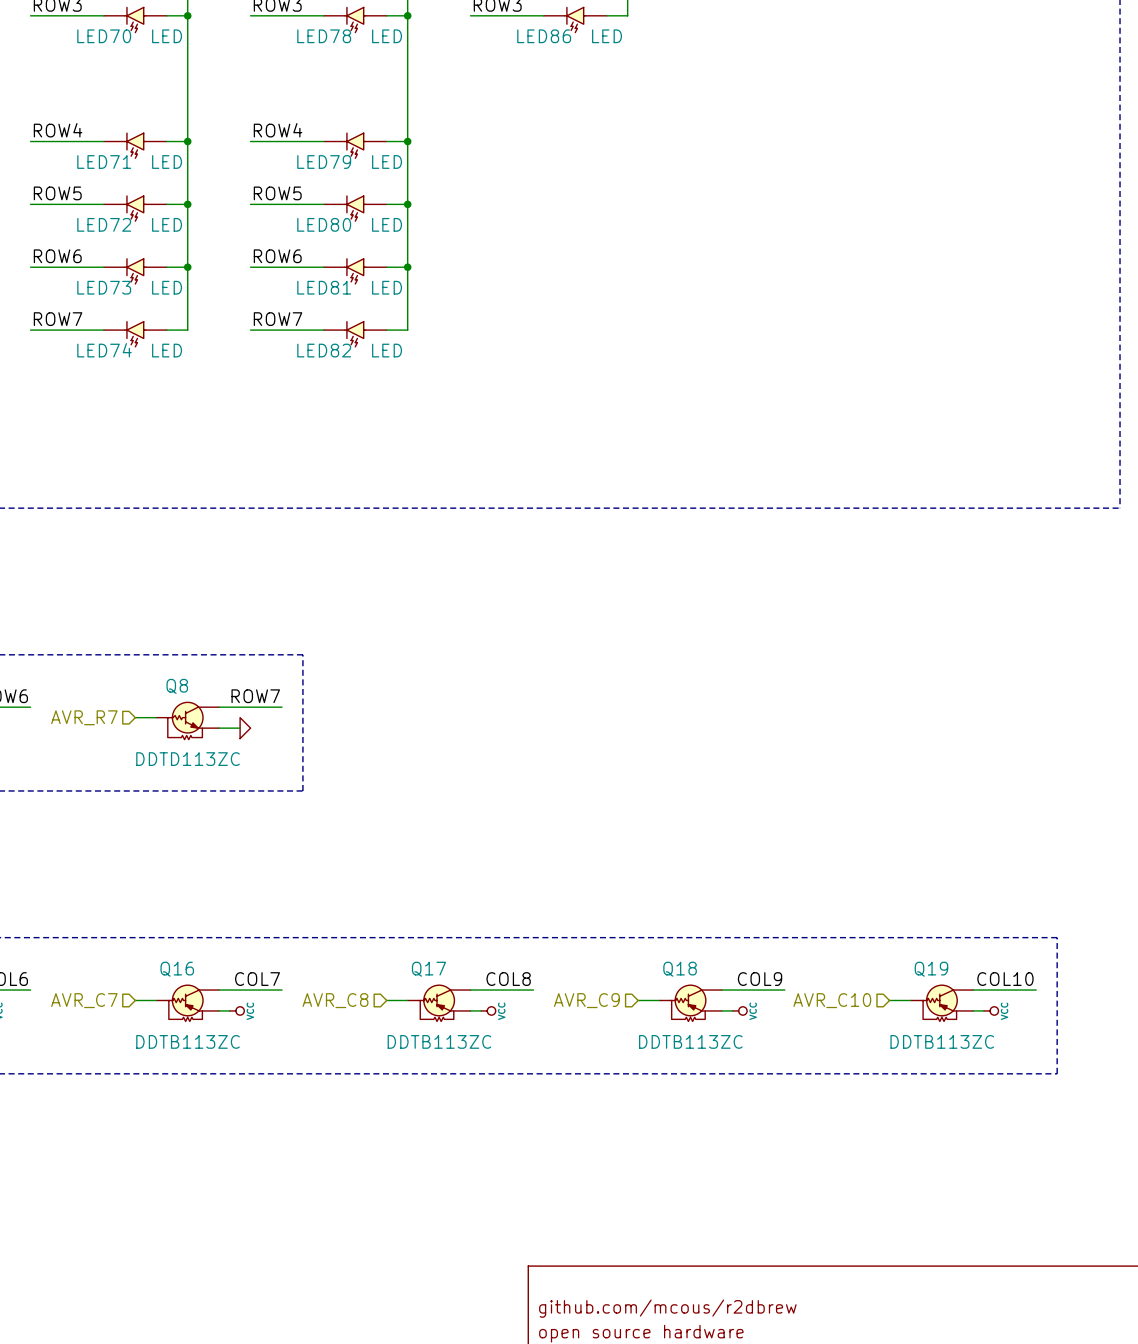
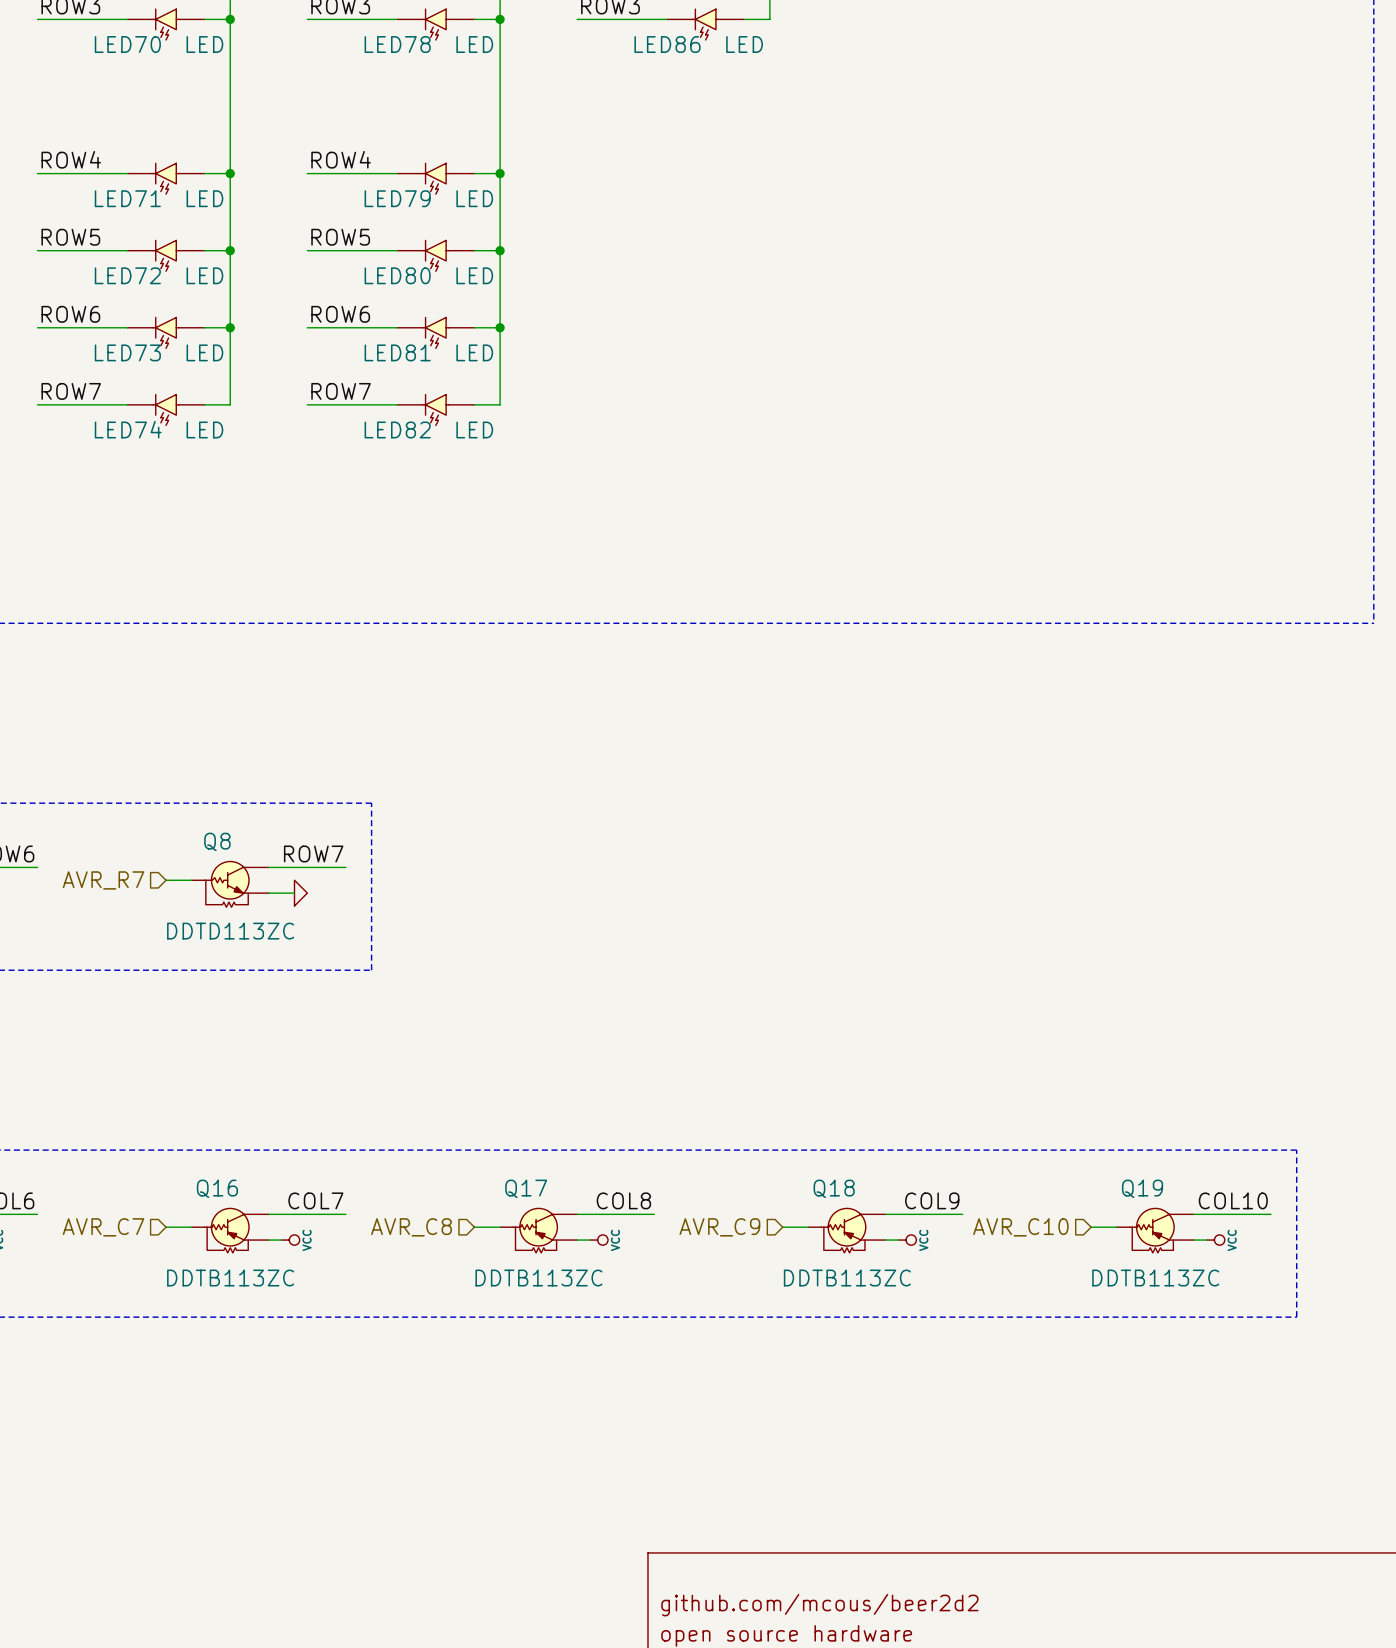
title block: github.com/mcous/r2dbrew (667, 1308) -> github.com/mcous/beer2d2 (819, 1605)

